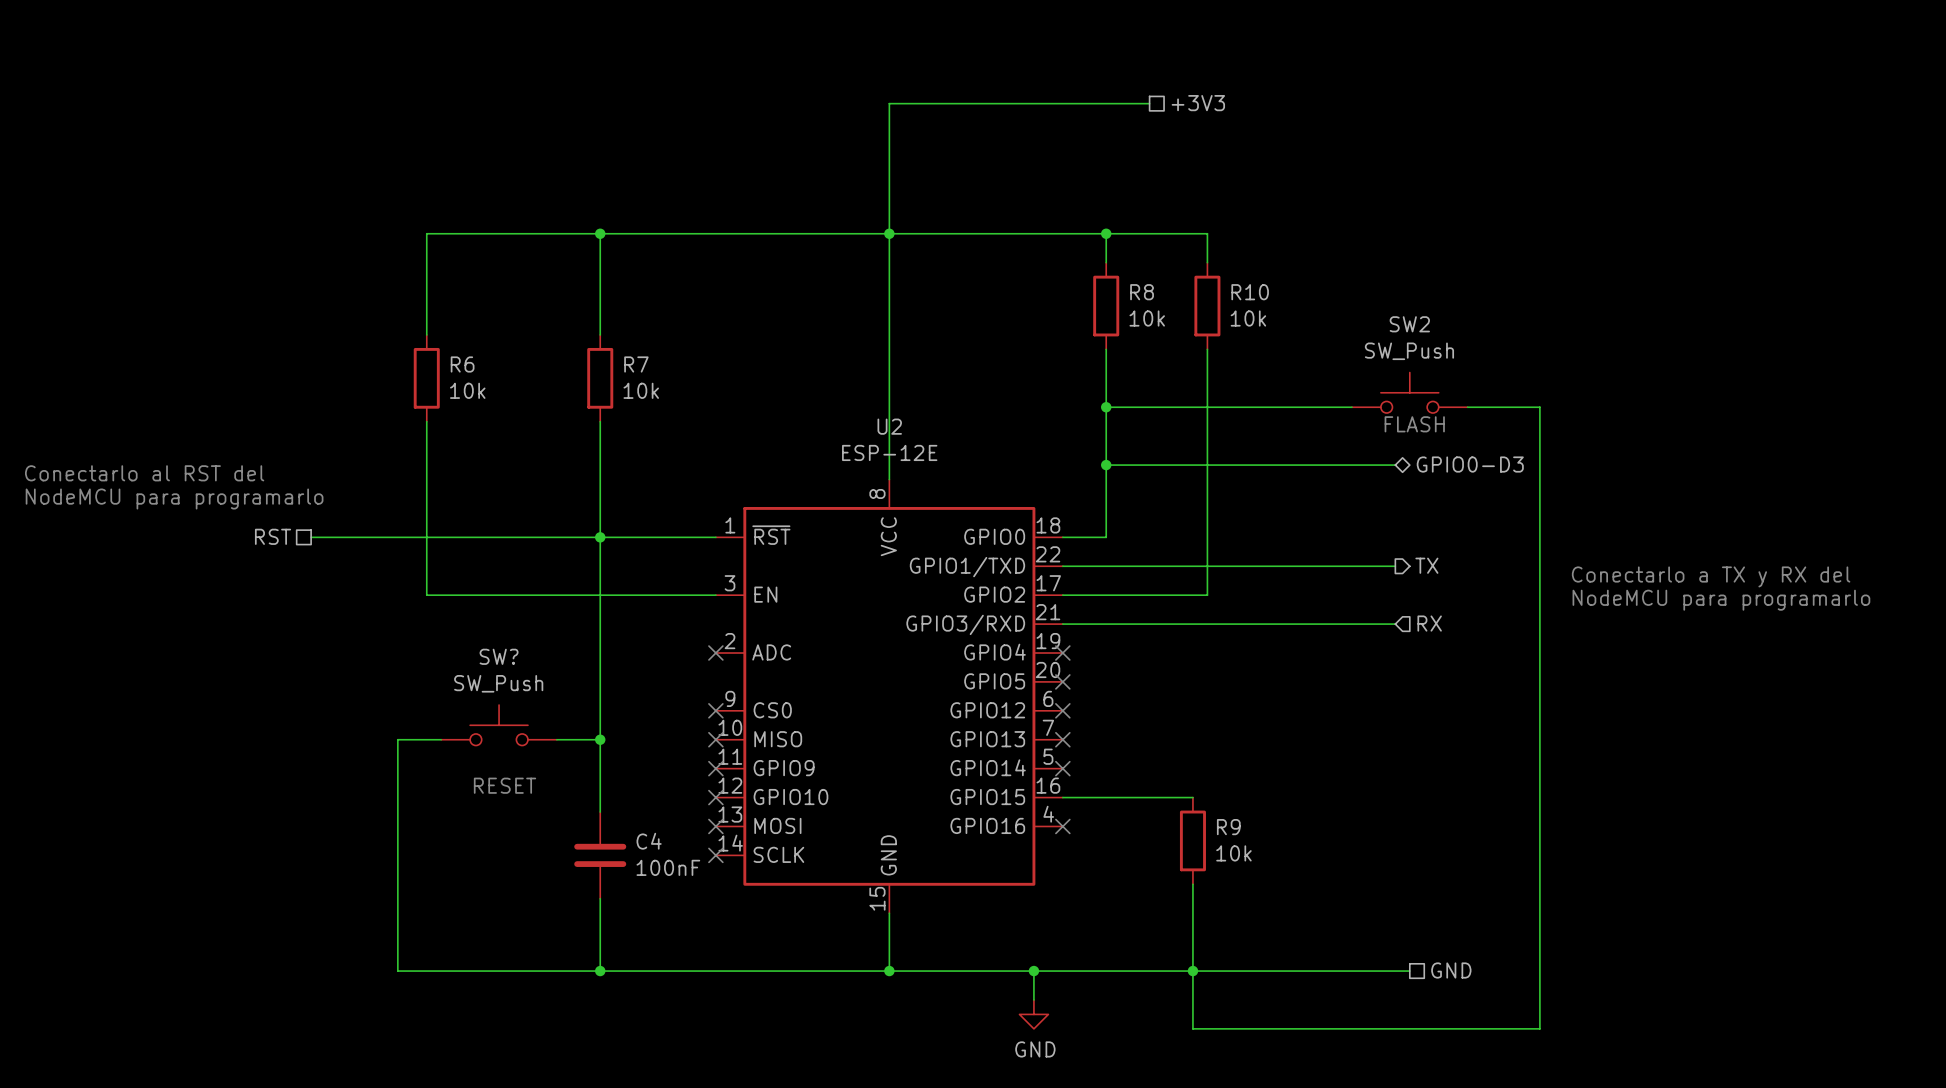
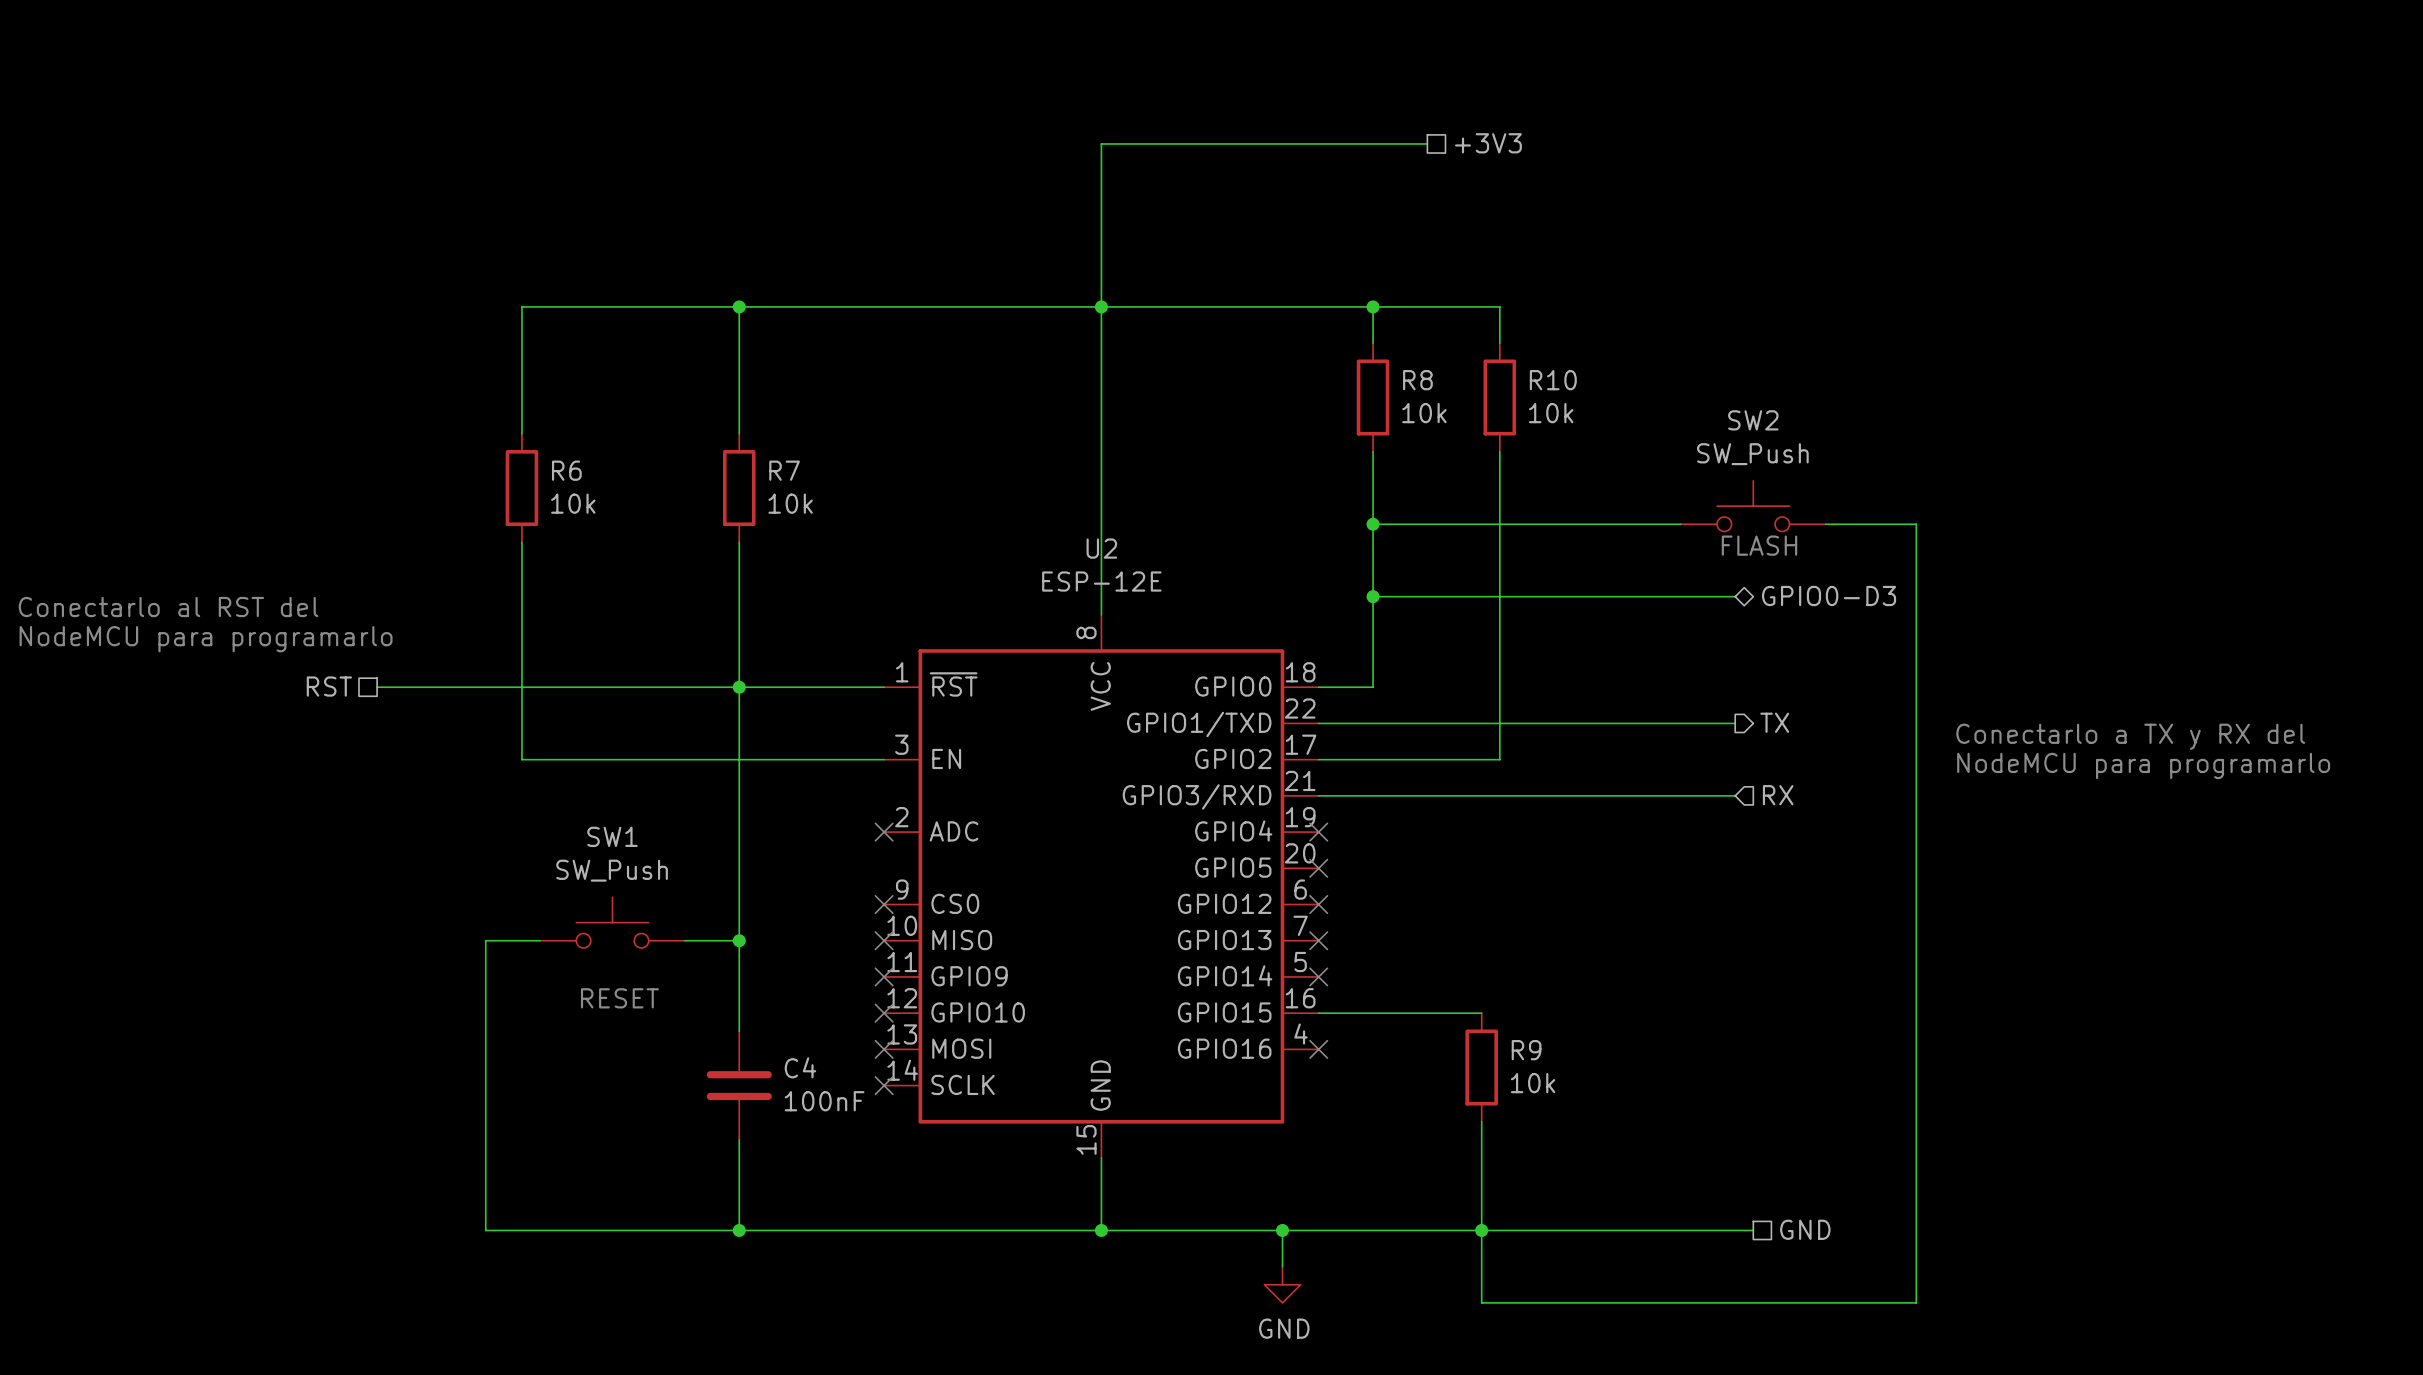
SW? name: SW? (499, 656) -> SW1 (612, 836)

